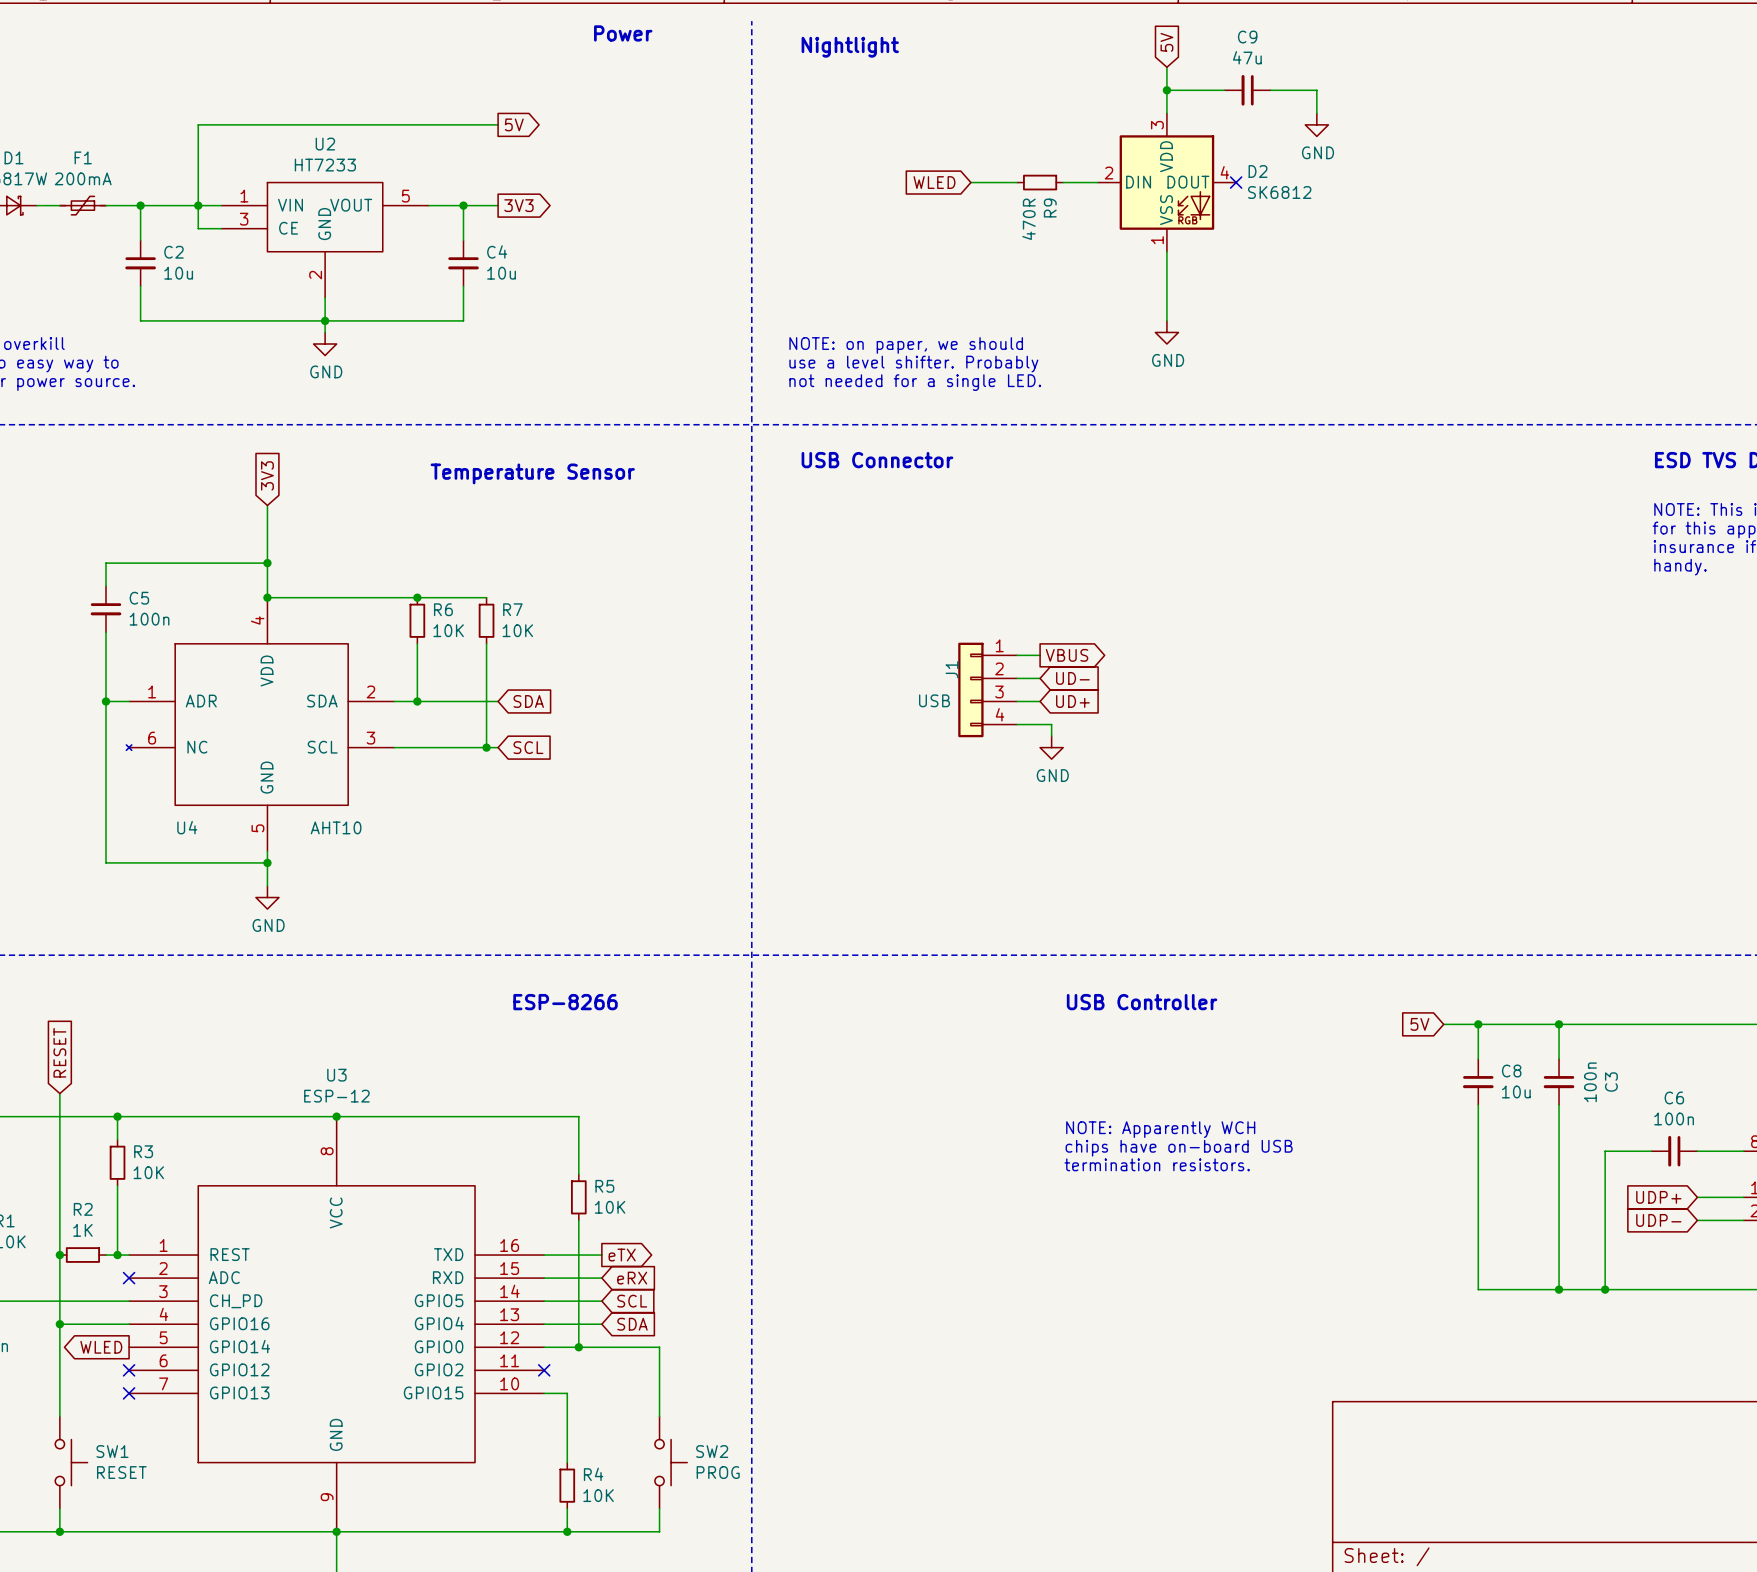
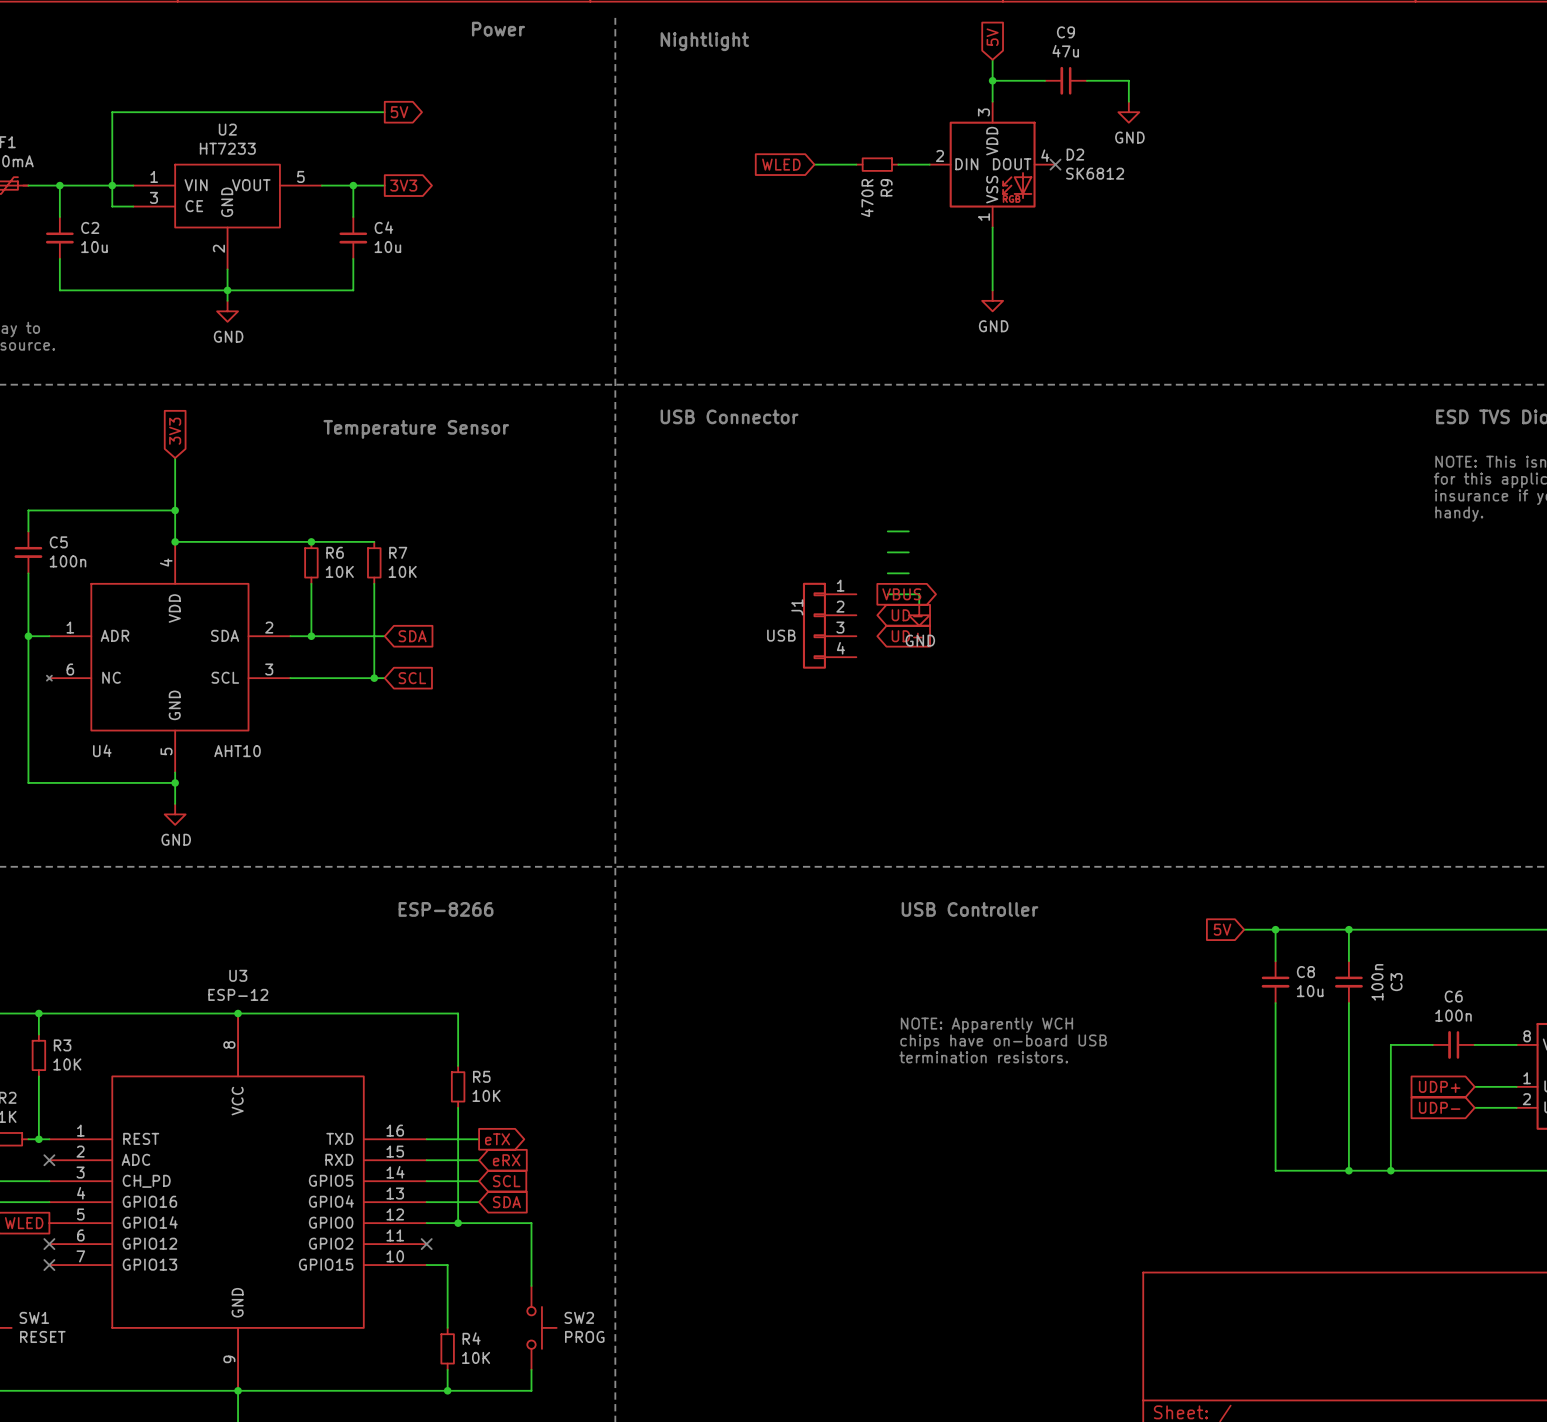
text: NOTE: on paper, we should (906, 345) -> none
text: use a level shifter. Probably (913, 364) -> none
text: not needed for a single LED. (915, 382) -> none
wire: (1017, 655) (1040, 655) -> (887, 531) (908, 531)
wire: (1017, 678) (1040, 678) -> (887, 552) (908, 552)
wire: (1017, 701) (1040, 701) -> (887, 573) (908, 573)
wire: (1017, 724) (1051, 724) (1051, 736) -> (887, 594) (919, 594) (919, 604)
power symbol position: GND (1051, 747) -> GND (919, 615)

